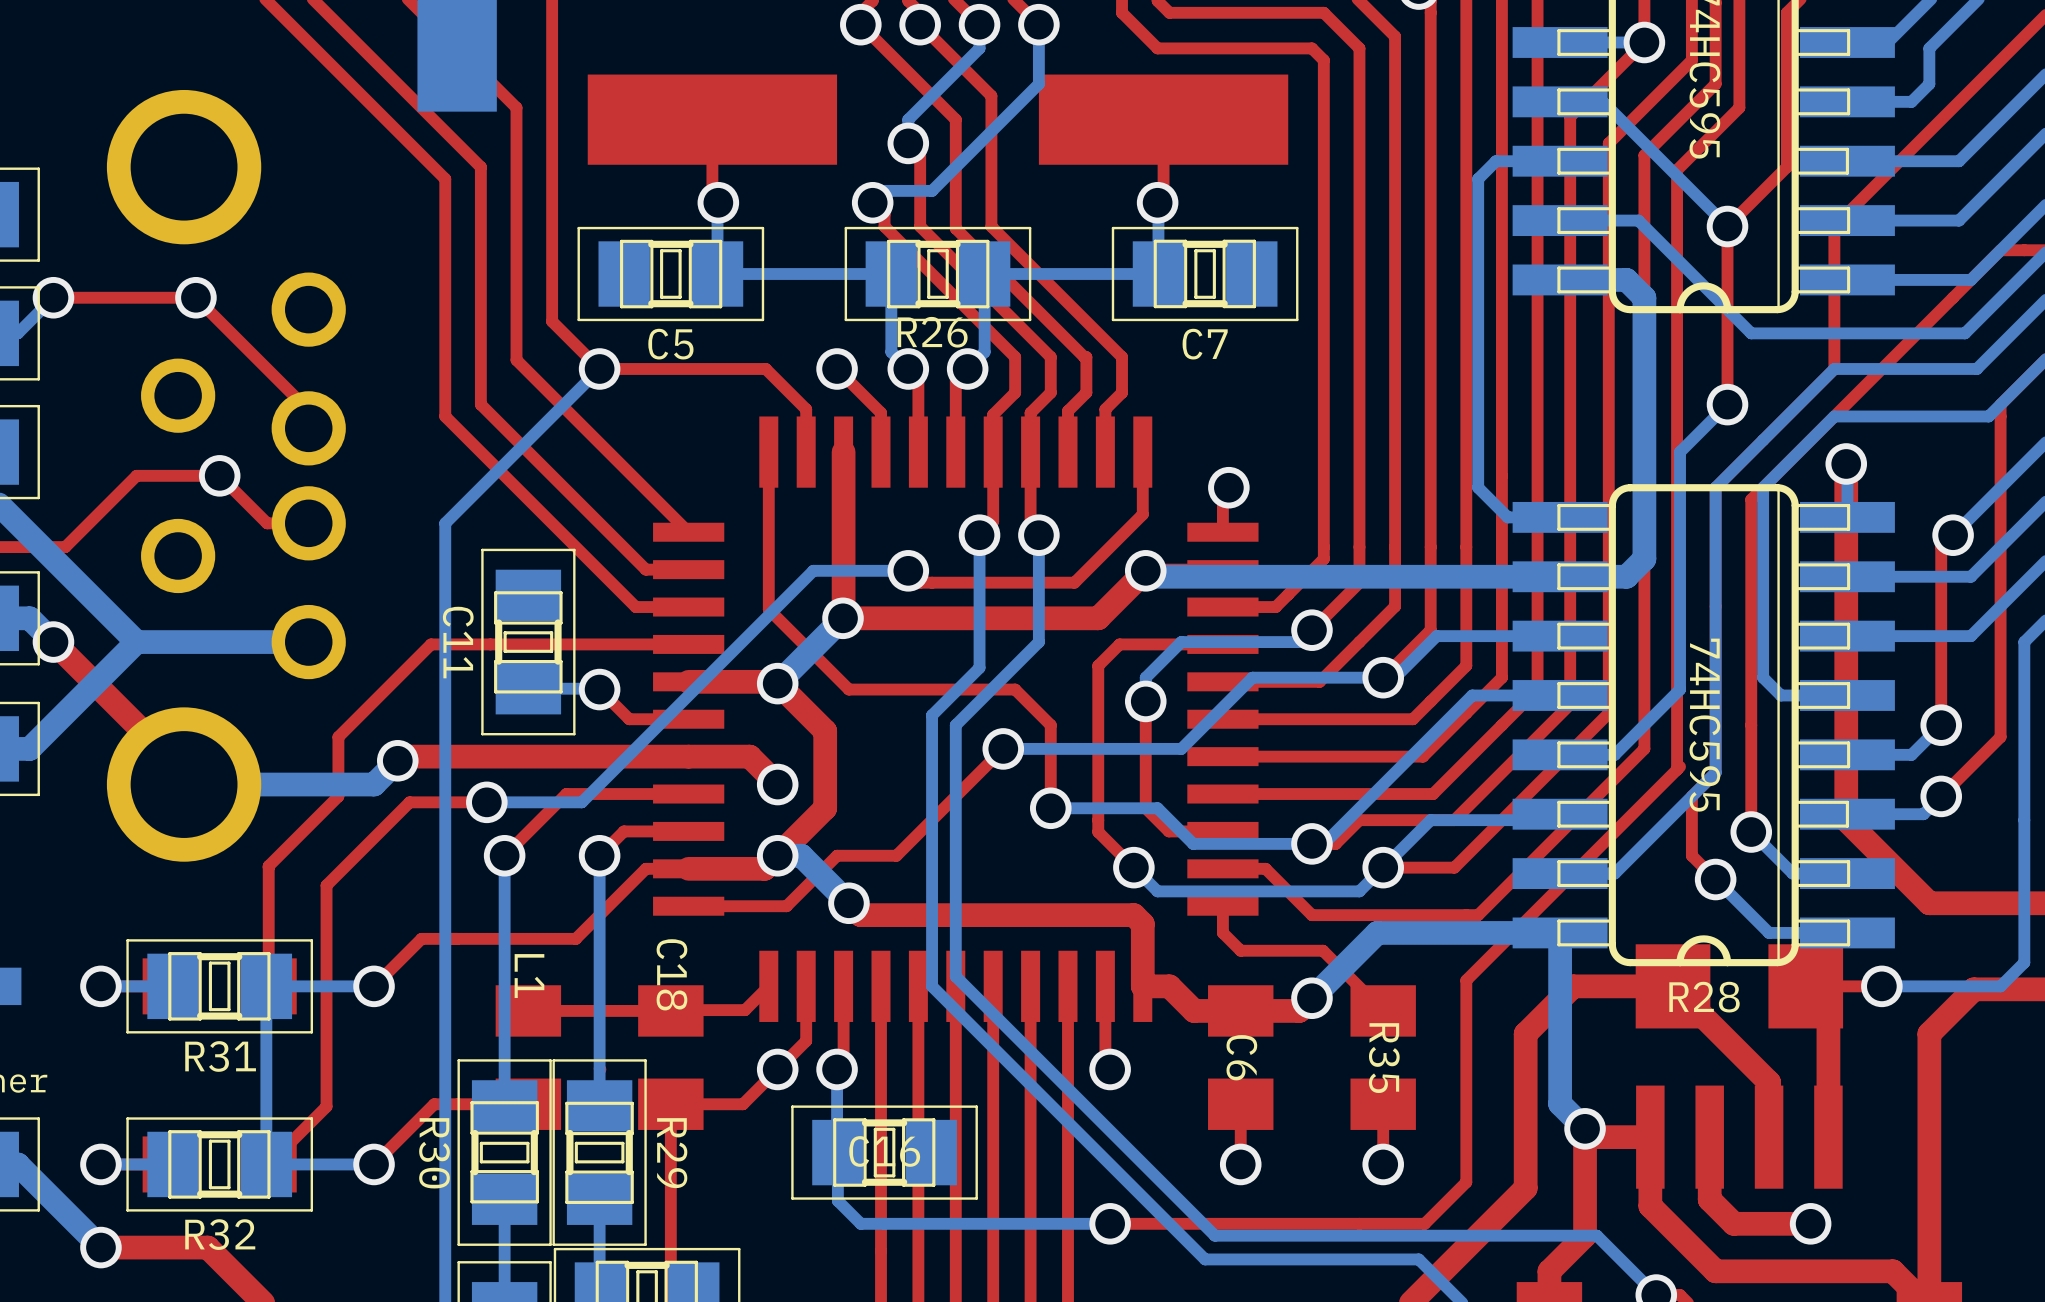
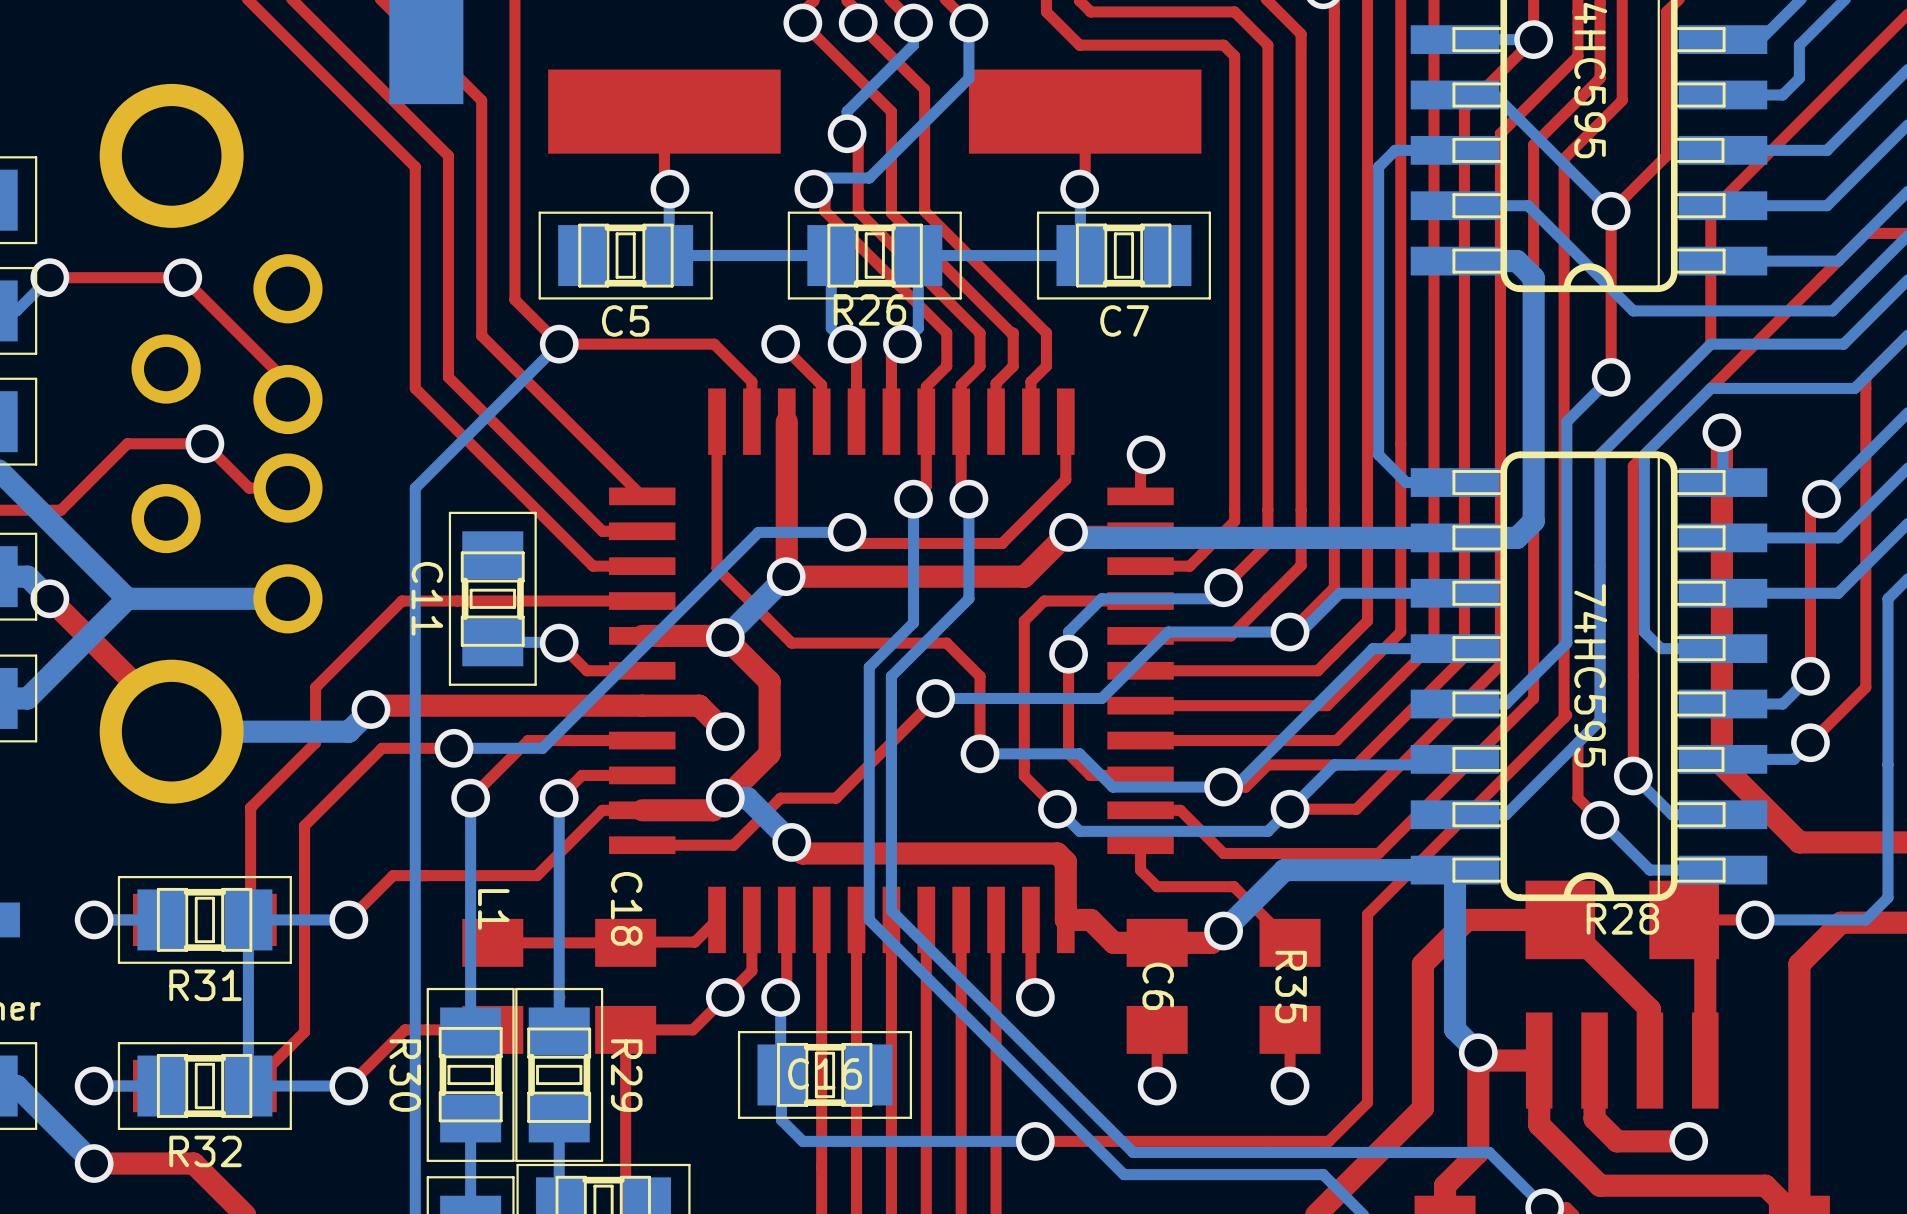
R28 name position: R28 (1704, 997) -> R28 (1622, 918)

